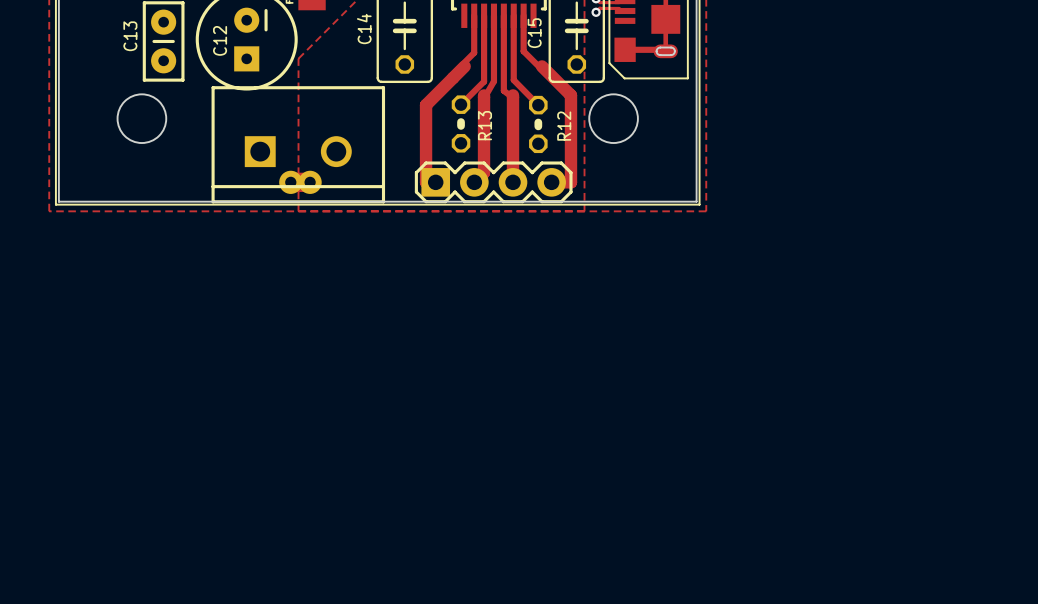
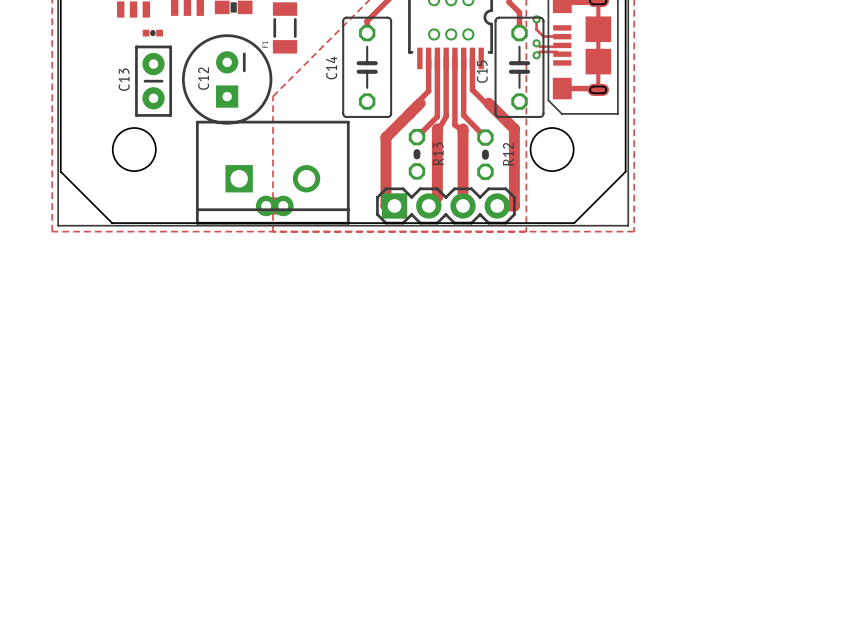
board edge: (58, 143) (58, 201) (116, 201) -> (60, 171) (112, 223)
board edge: (696, 143) (696, 201) (638, 201) -> (625, 171) (574, 223)

